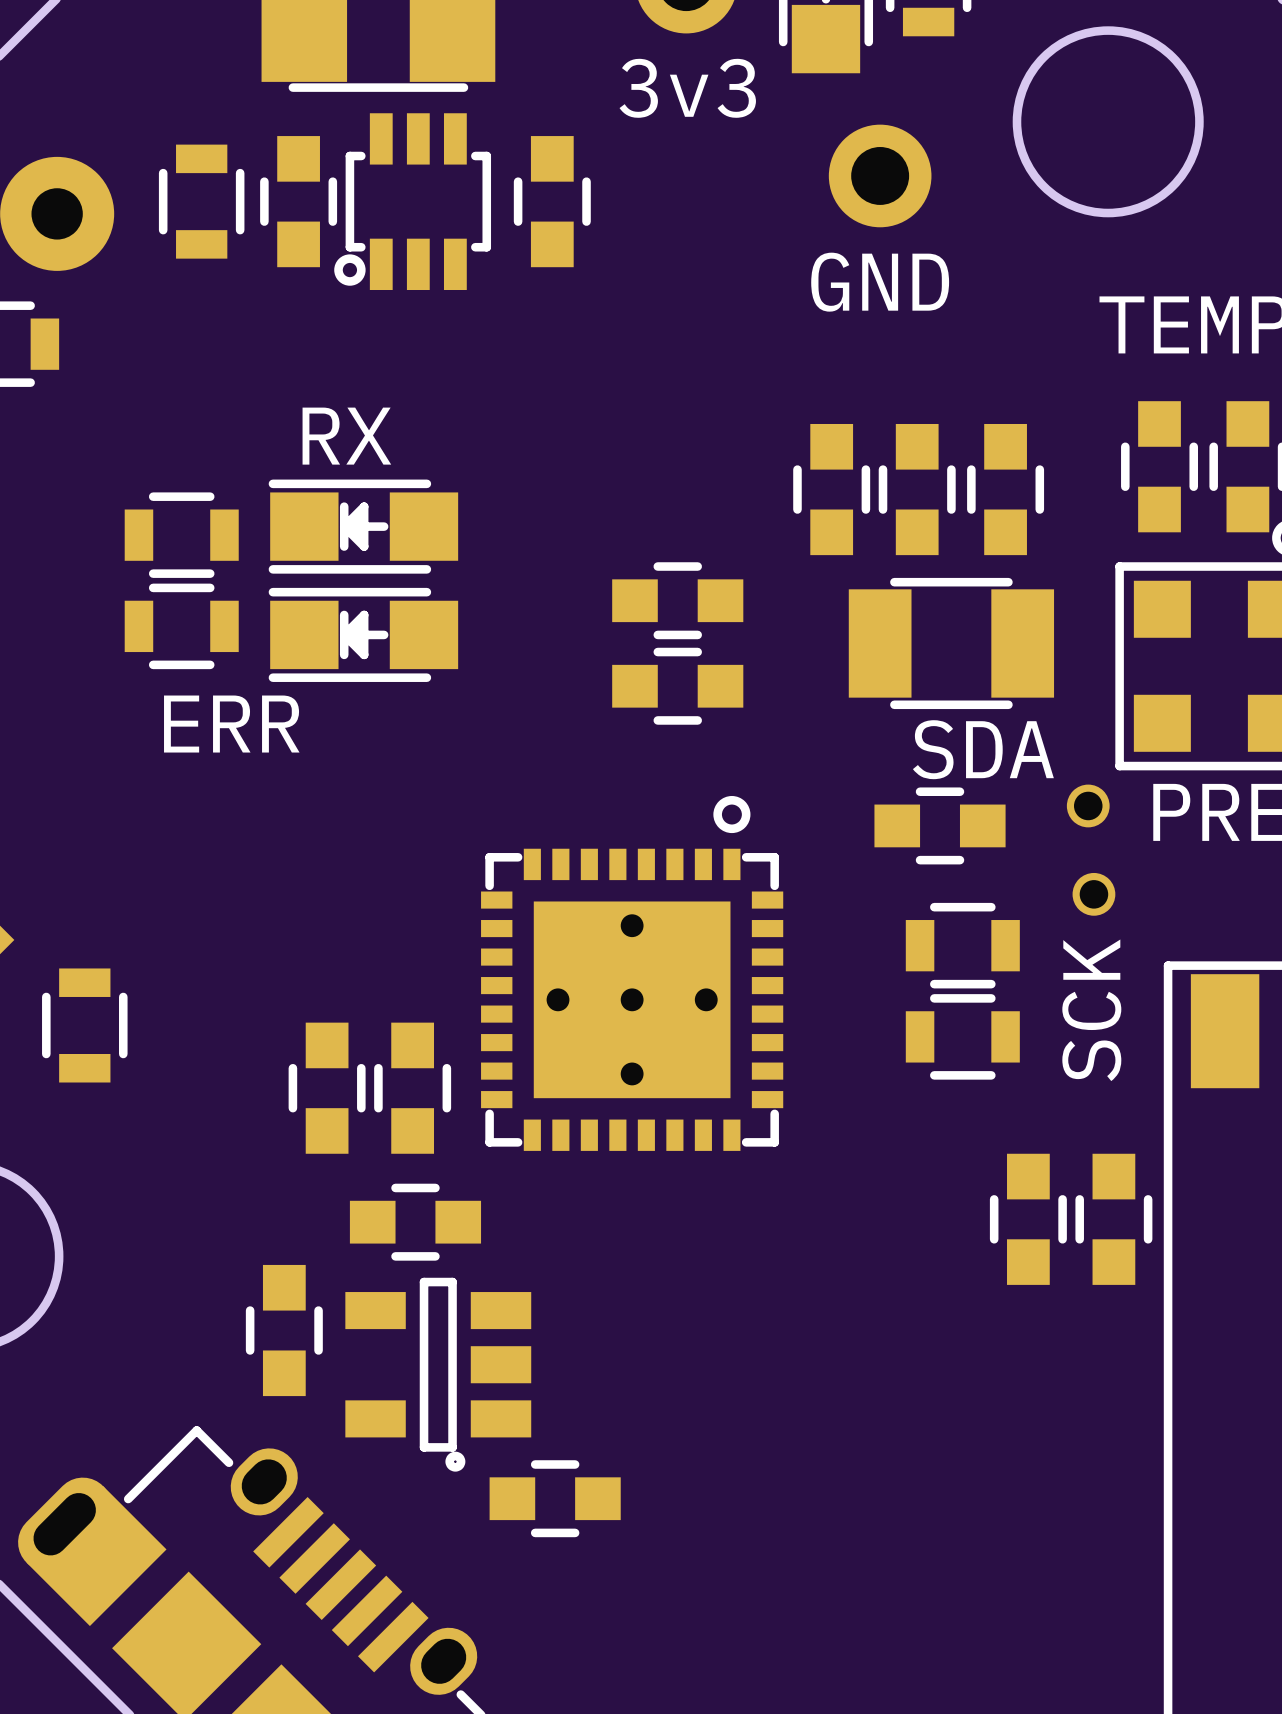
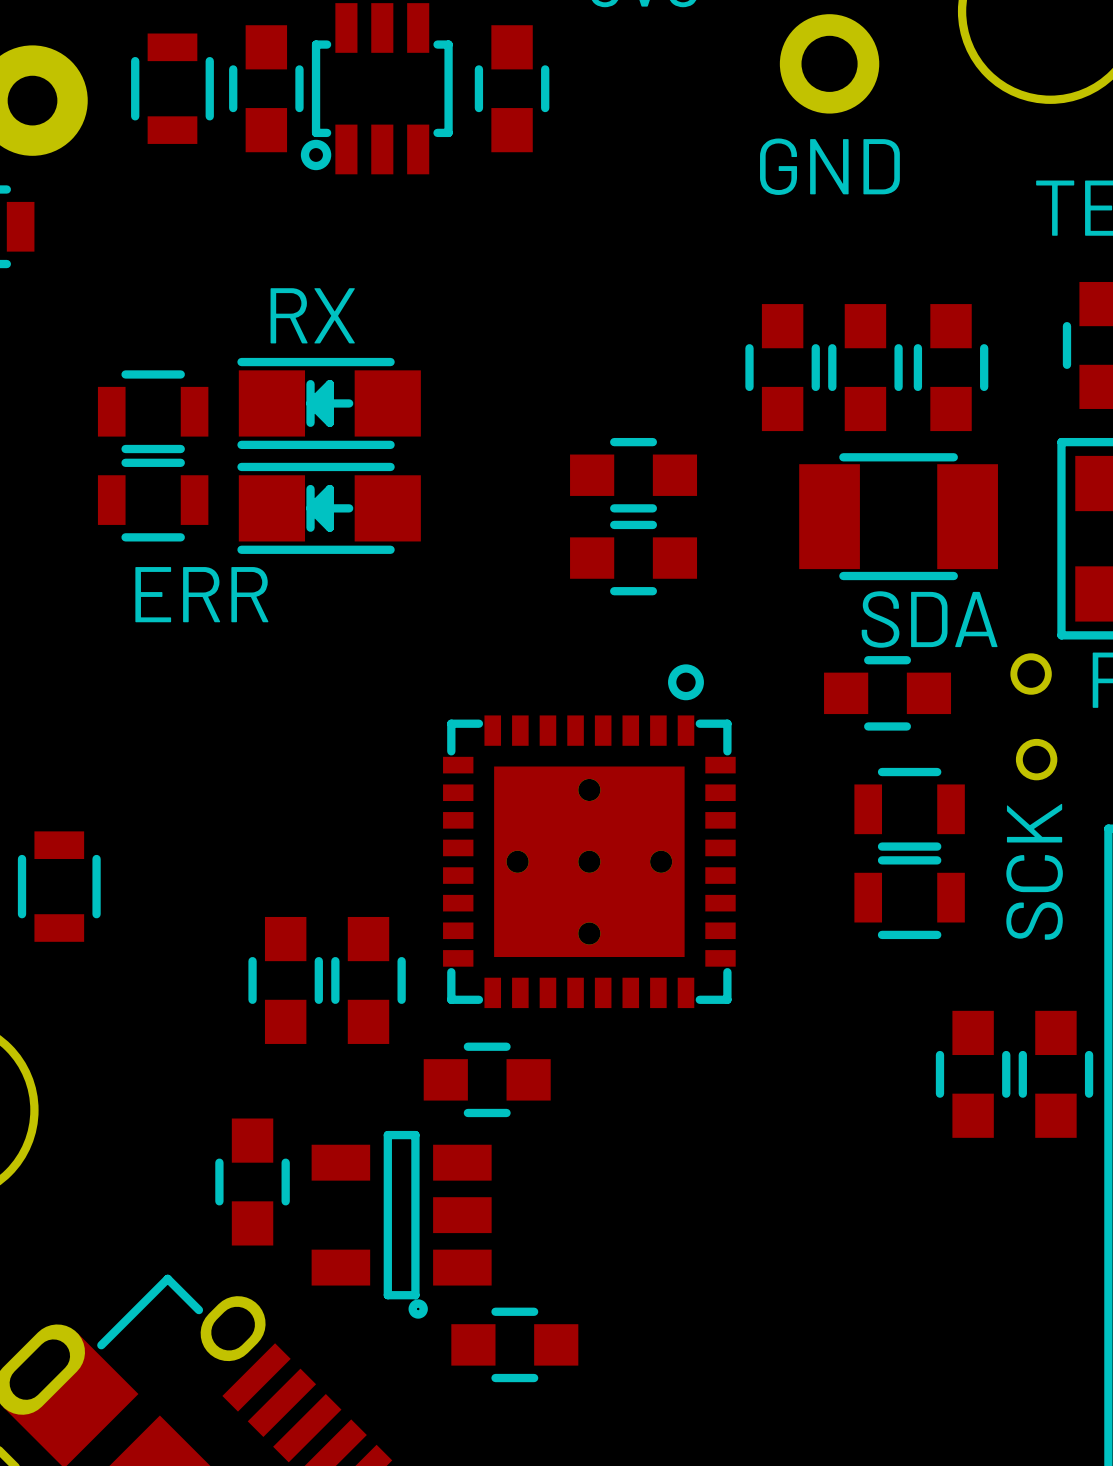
part position: (327, 1088) -> (285, 980)
part position: (412, 1088) -> (368, 980)
part position: (415, 1222) -> (487, 1079)

